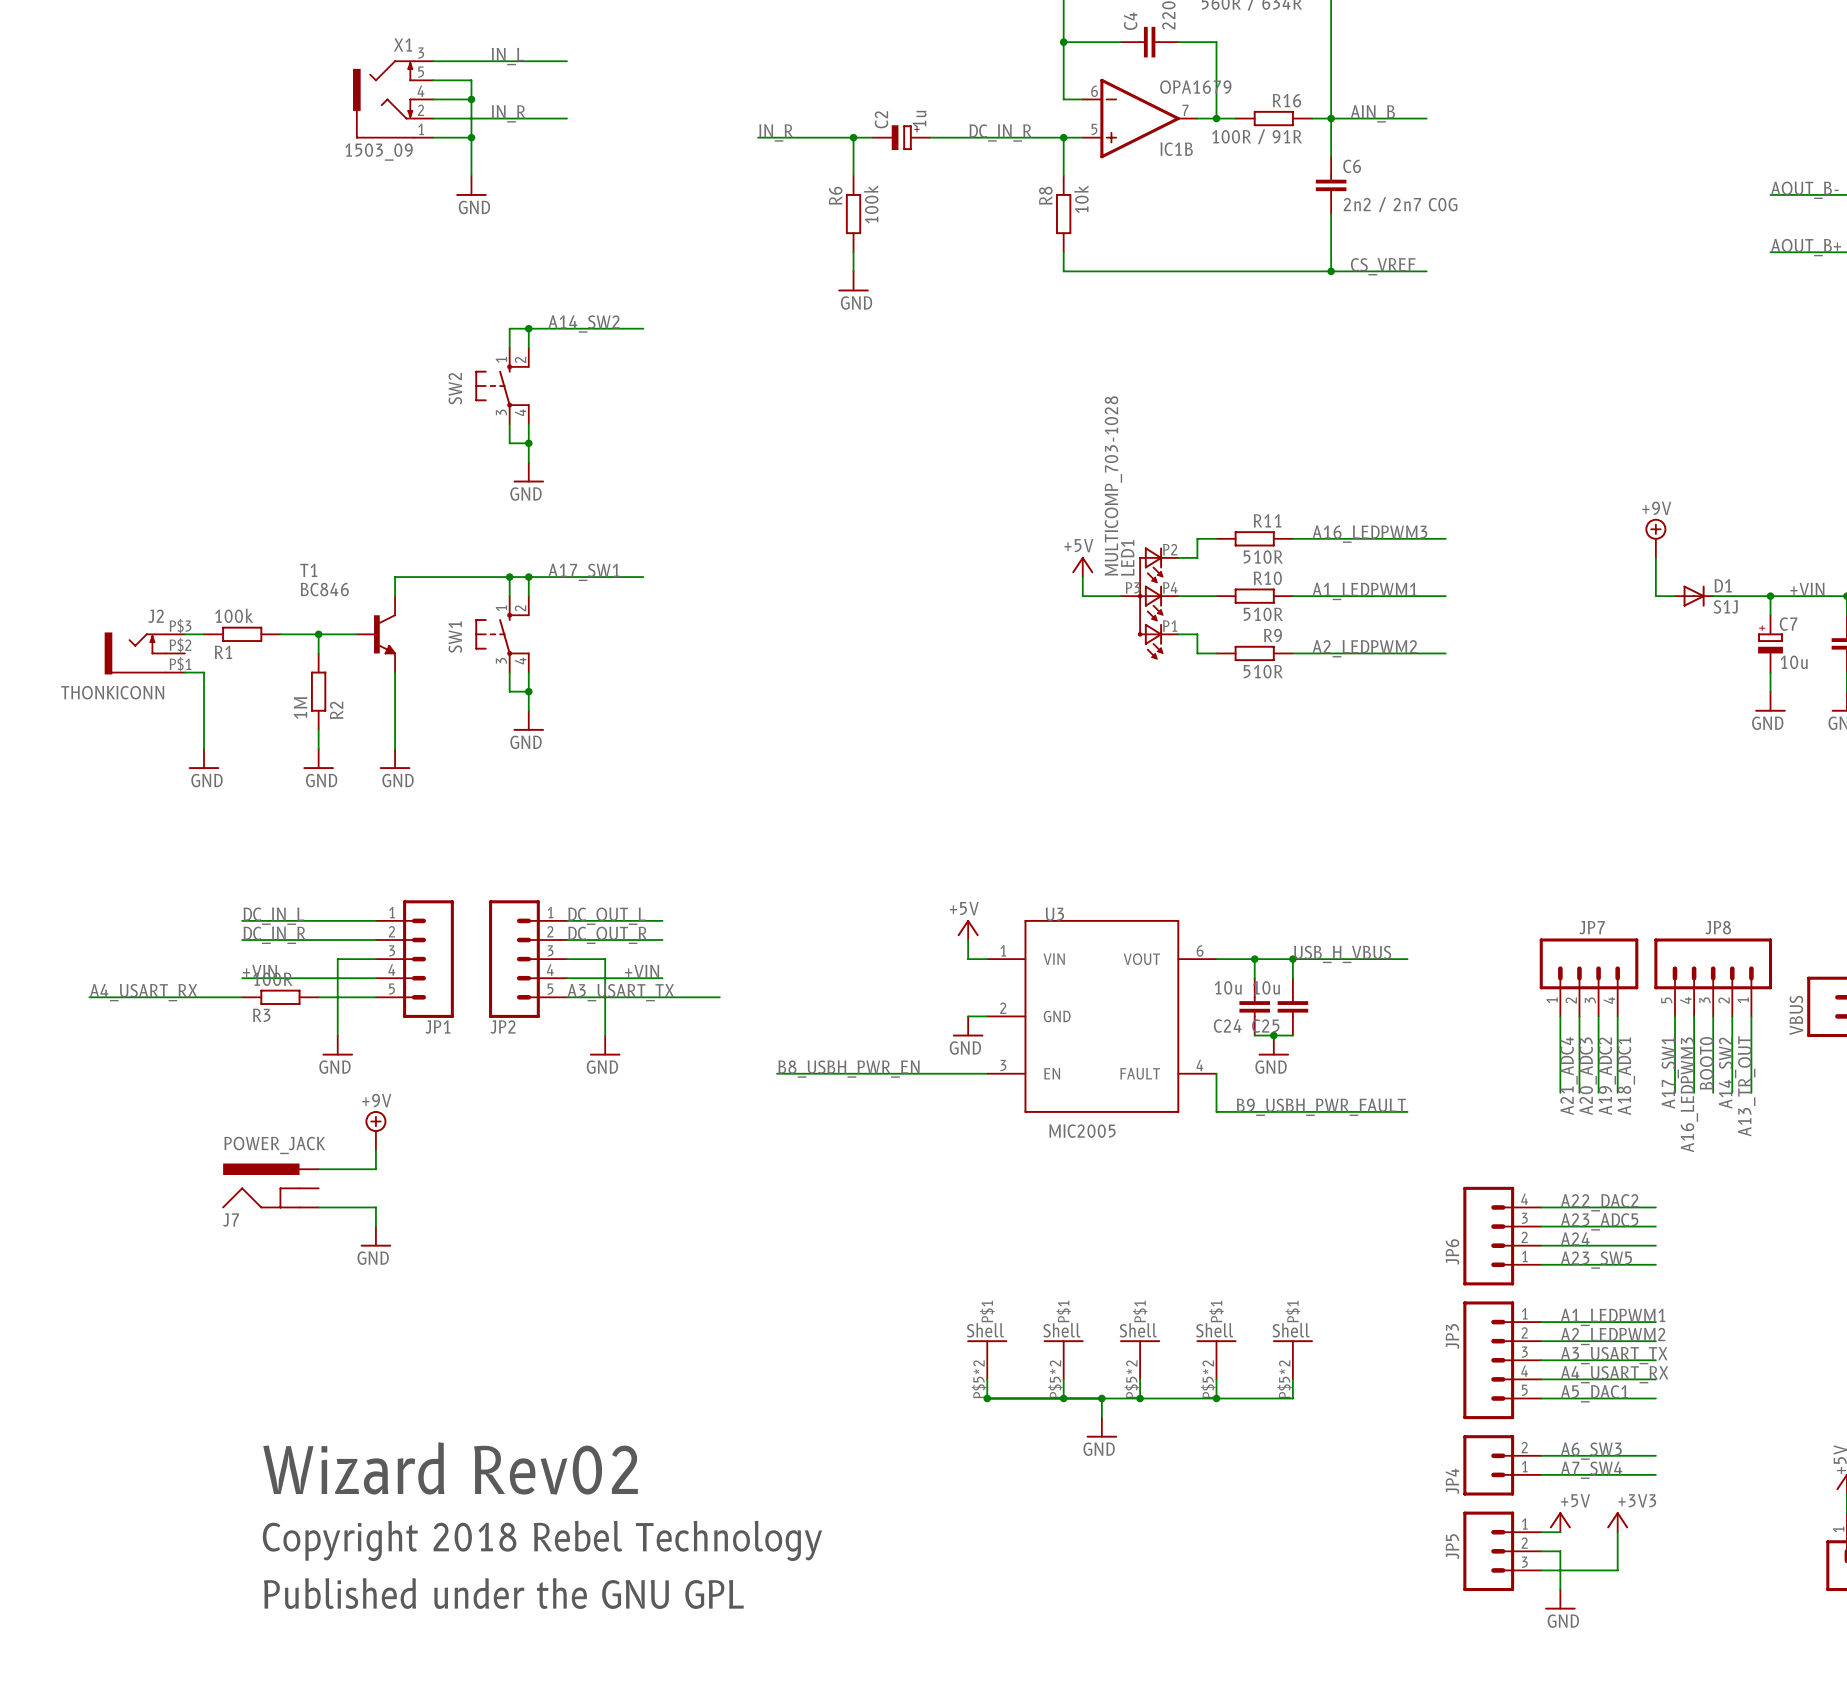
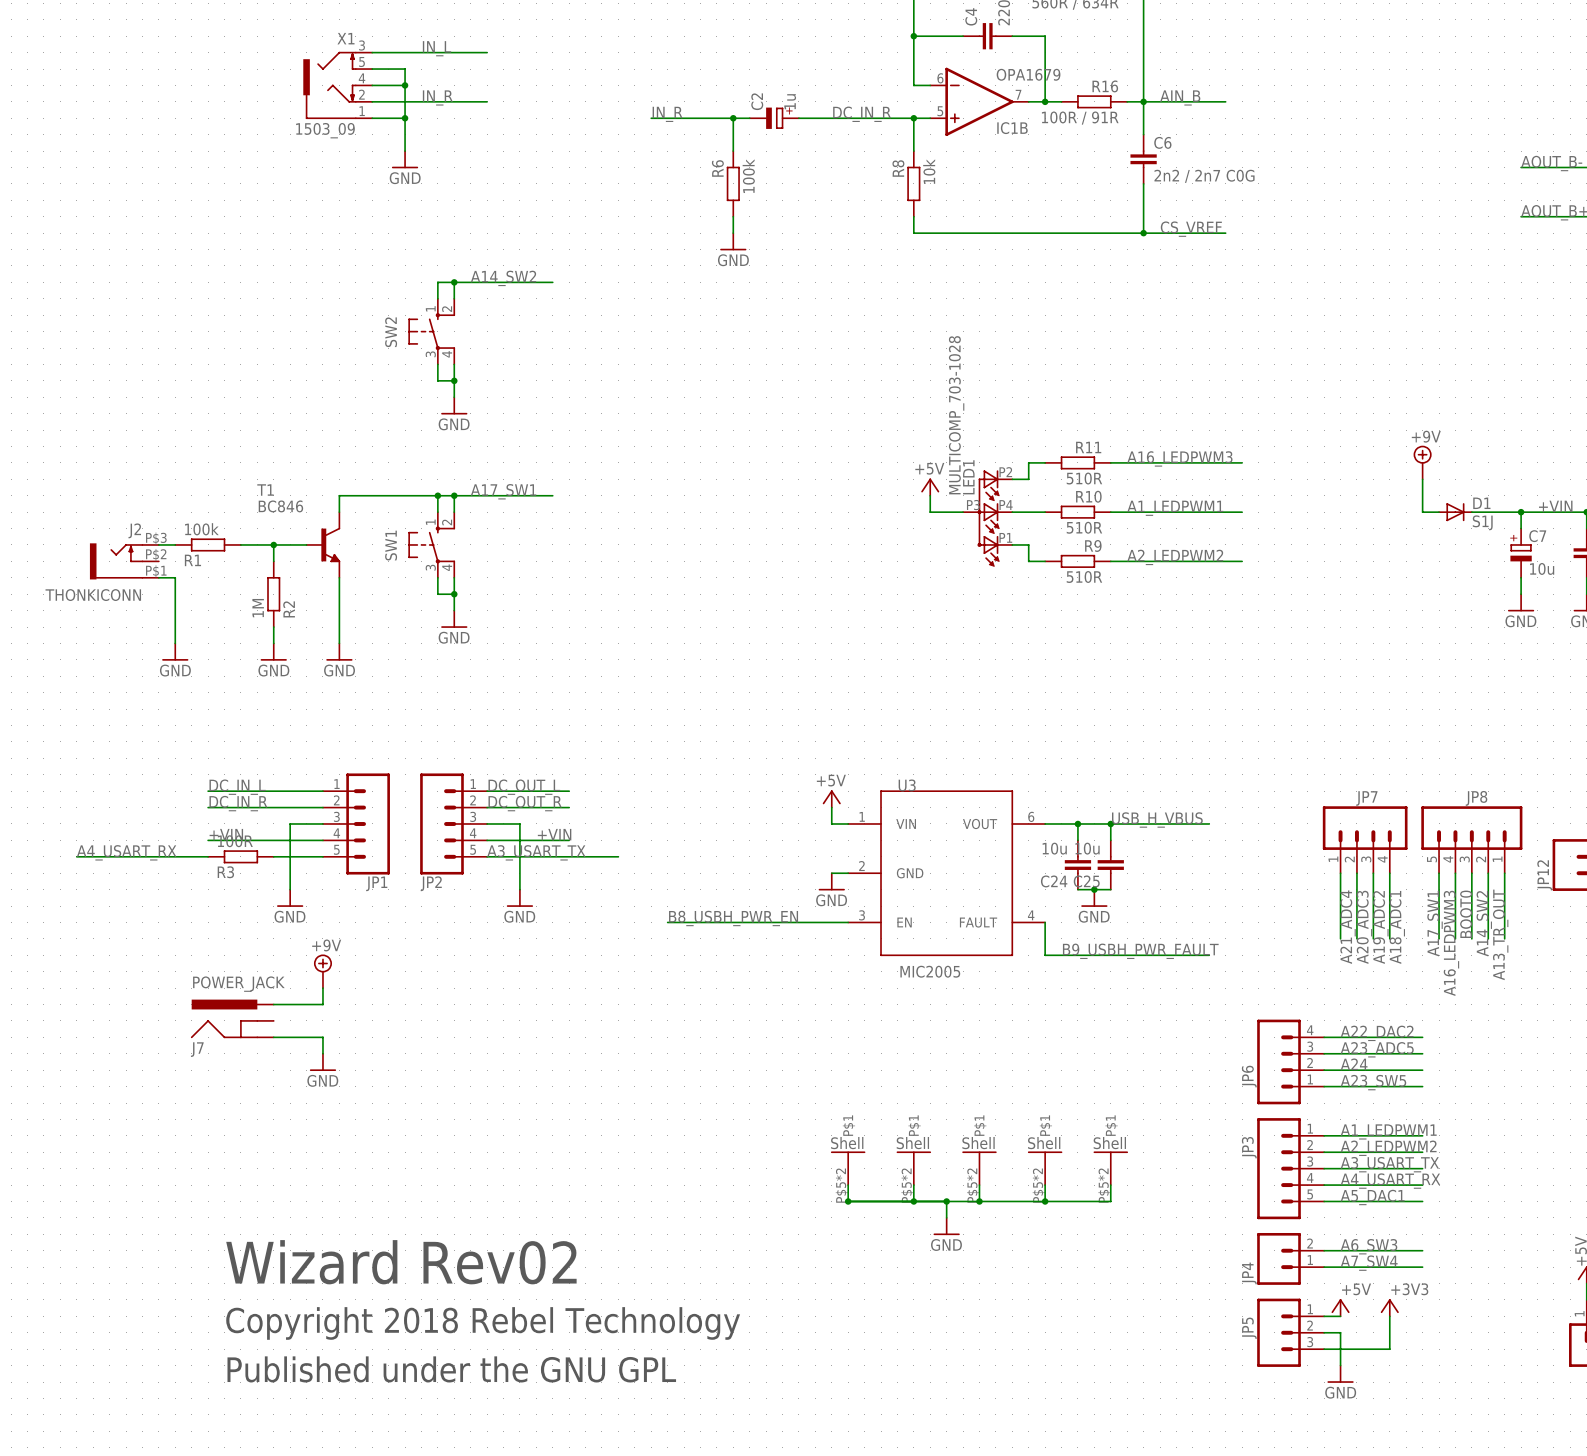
VBUS name: VBUS (1796, 1015) -> JP12 (1544, 875)

